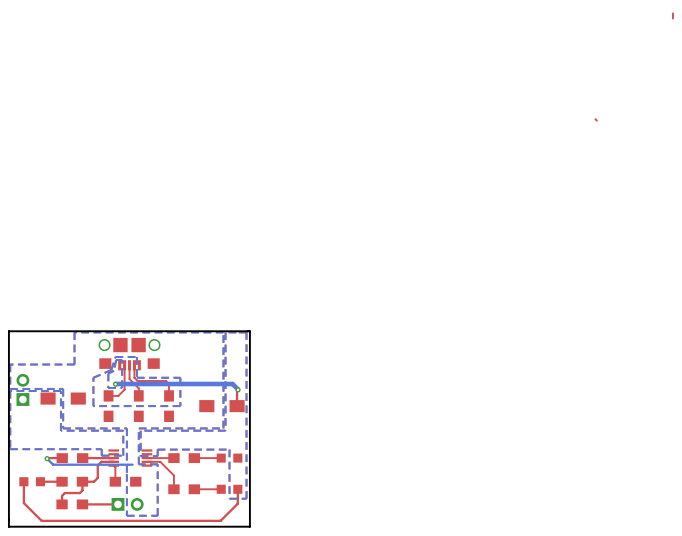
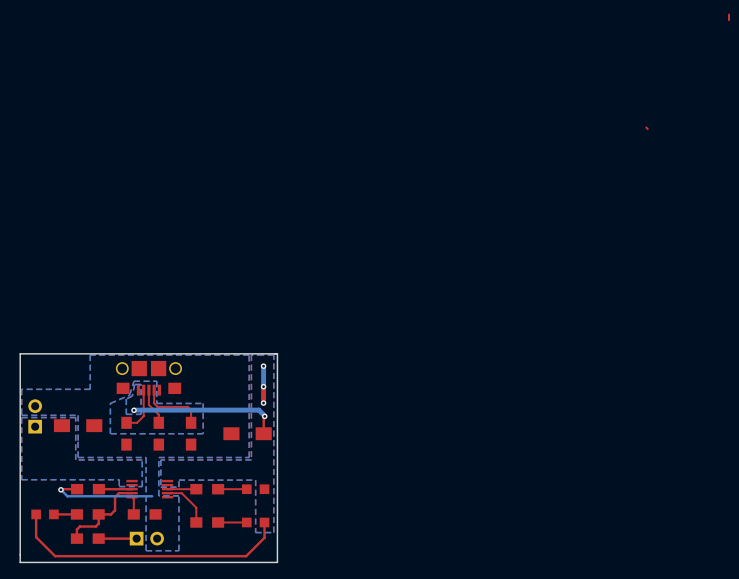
bottom track: none -> (263, 366) (263, 386)
via: none -> (263, 366)
top track: none -> (263, 386) (263, 403)
via: none -> (263, 386)
via: none -> (263, 403)

